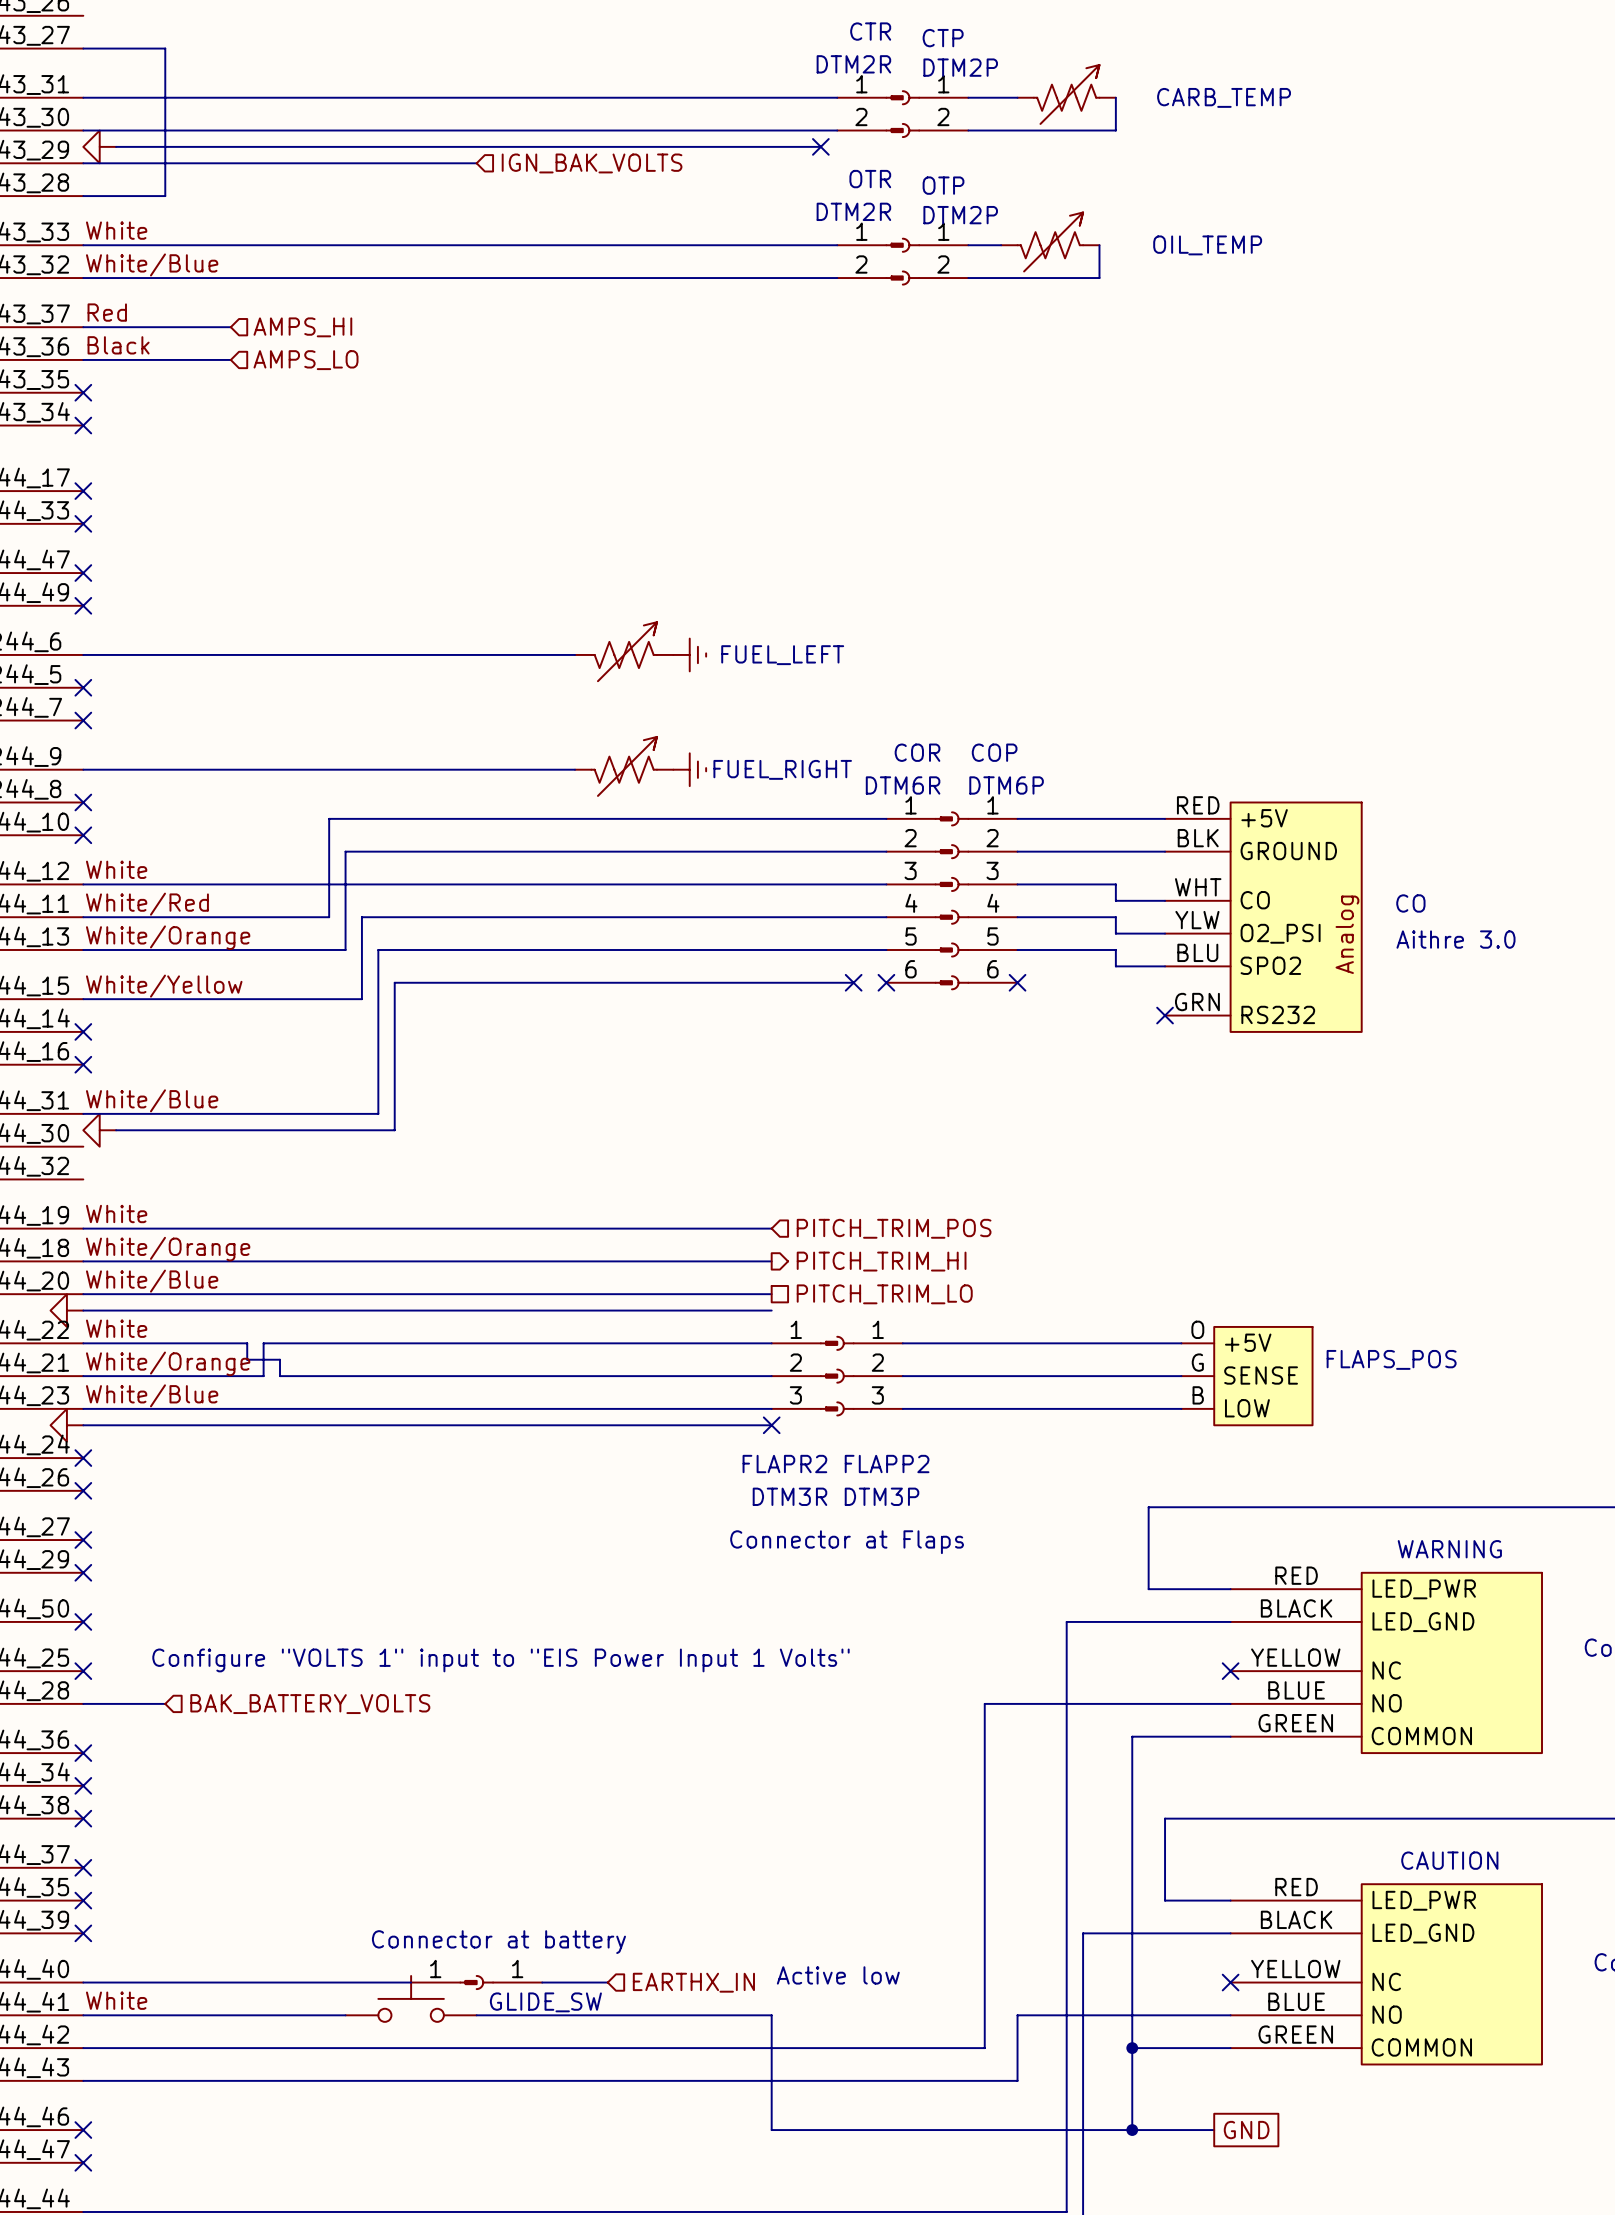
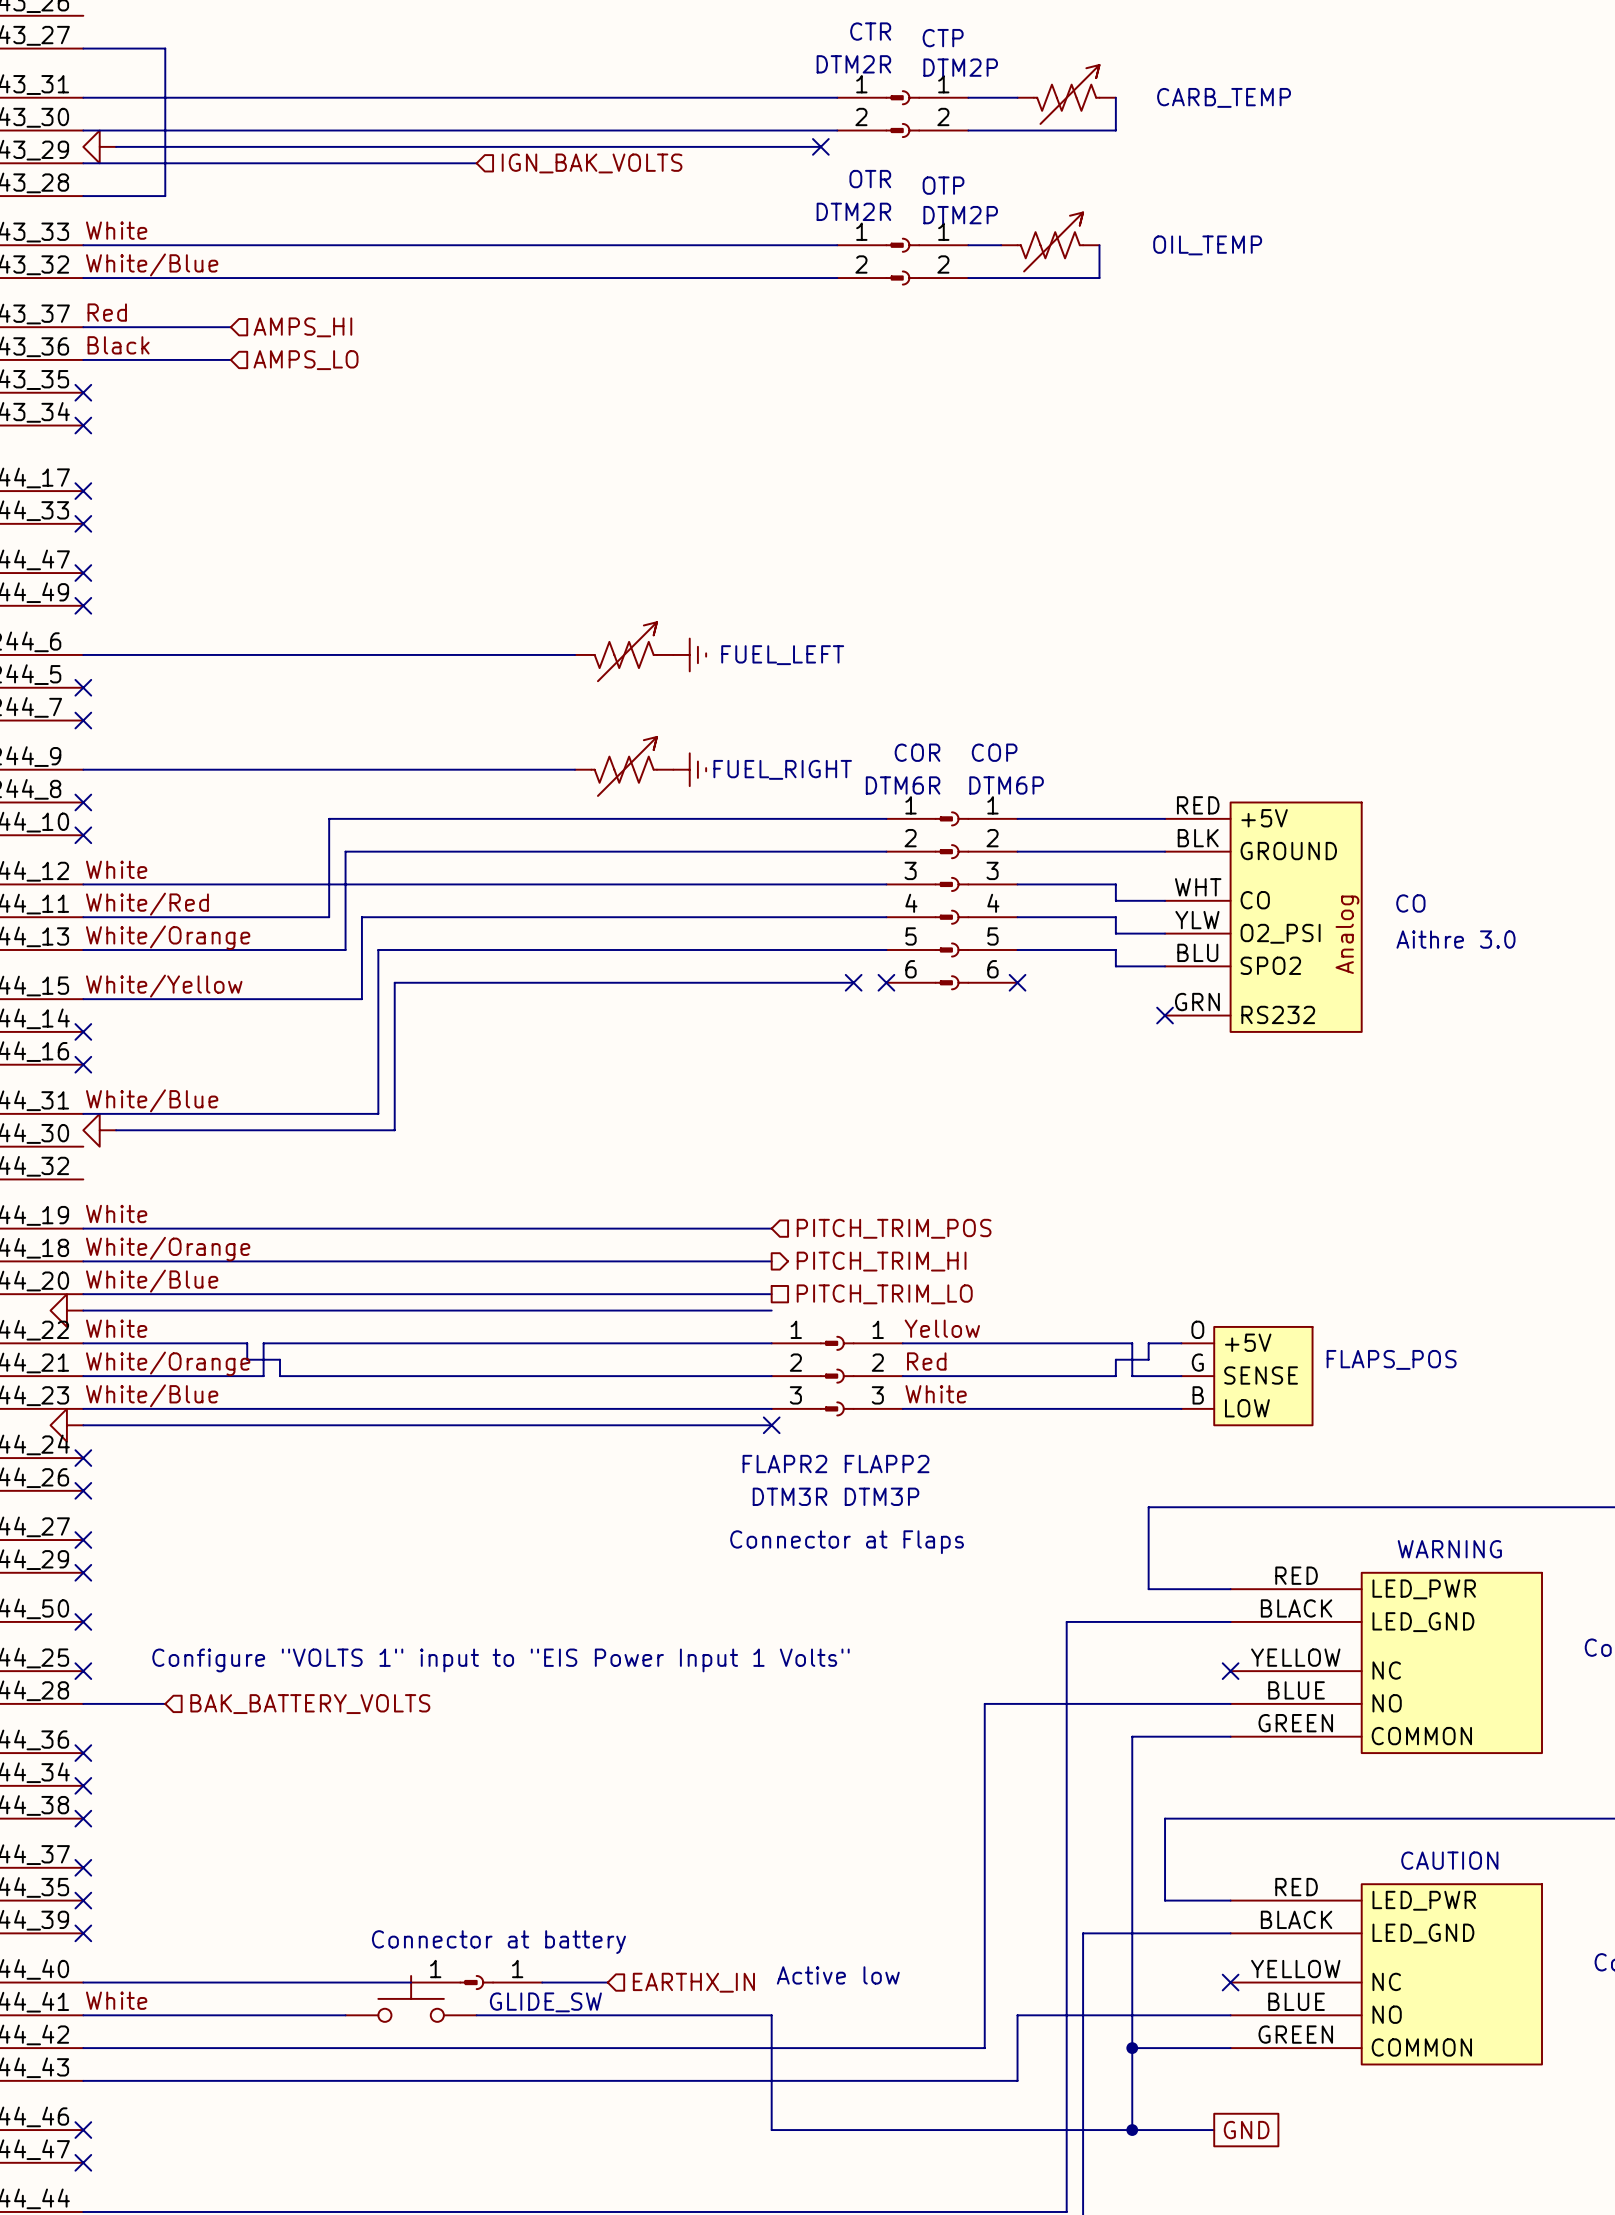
label: none -> Yellow (942, 1328)
wire: (1132, 1343) (1148, 1343) -> (1132, 1343) (1132, 1376)
label: none -> Red (926, 1361)
wire: (1115, 1376) (1132, 1376) -> (1115, 1376) (1115, 1359) (1148, 1359) (1148, 1343)
label: none -> White (936, 1394)

